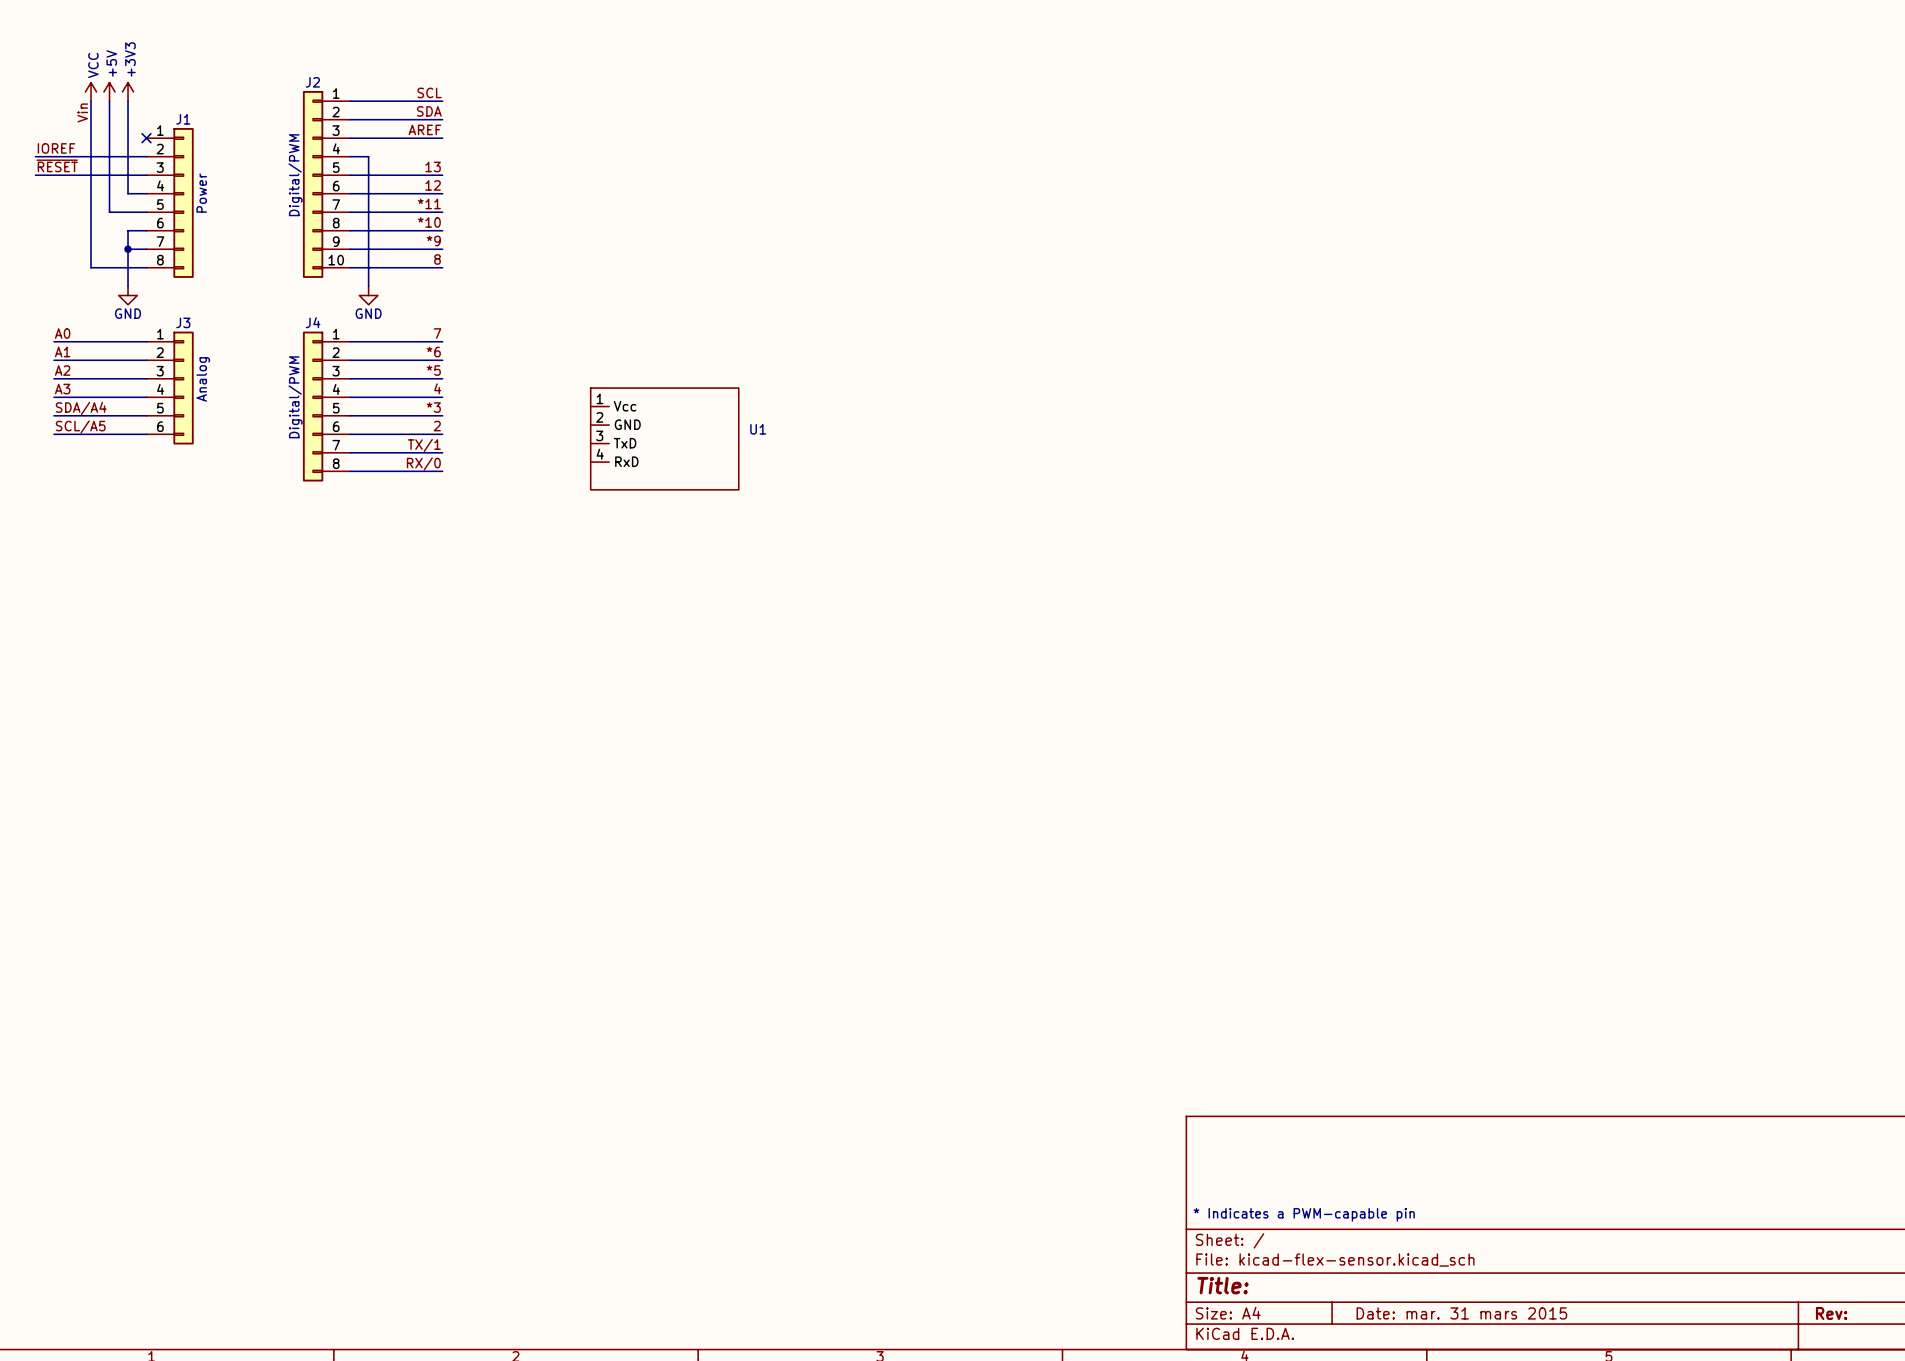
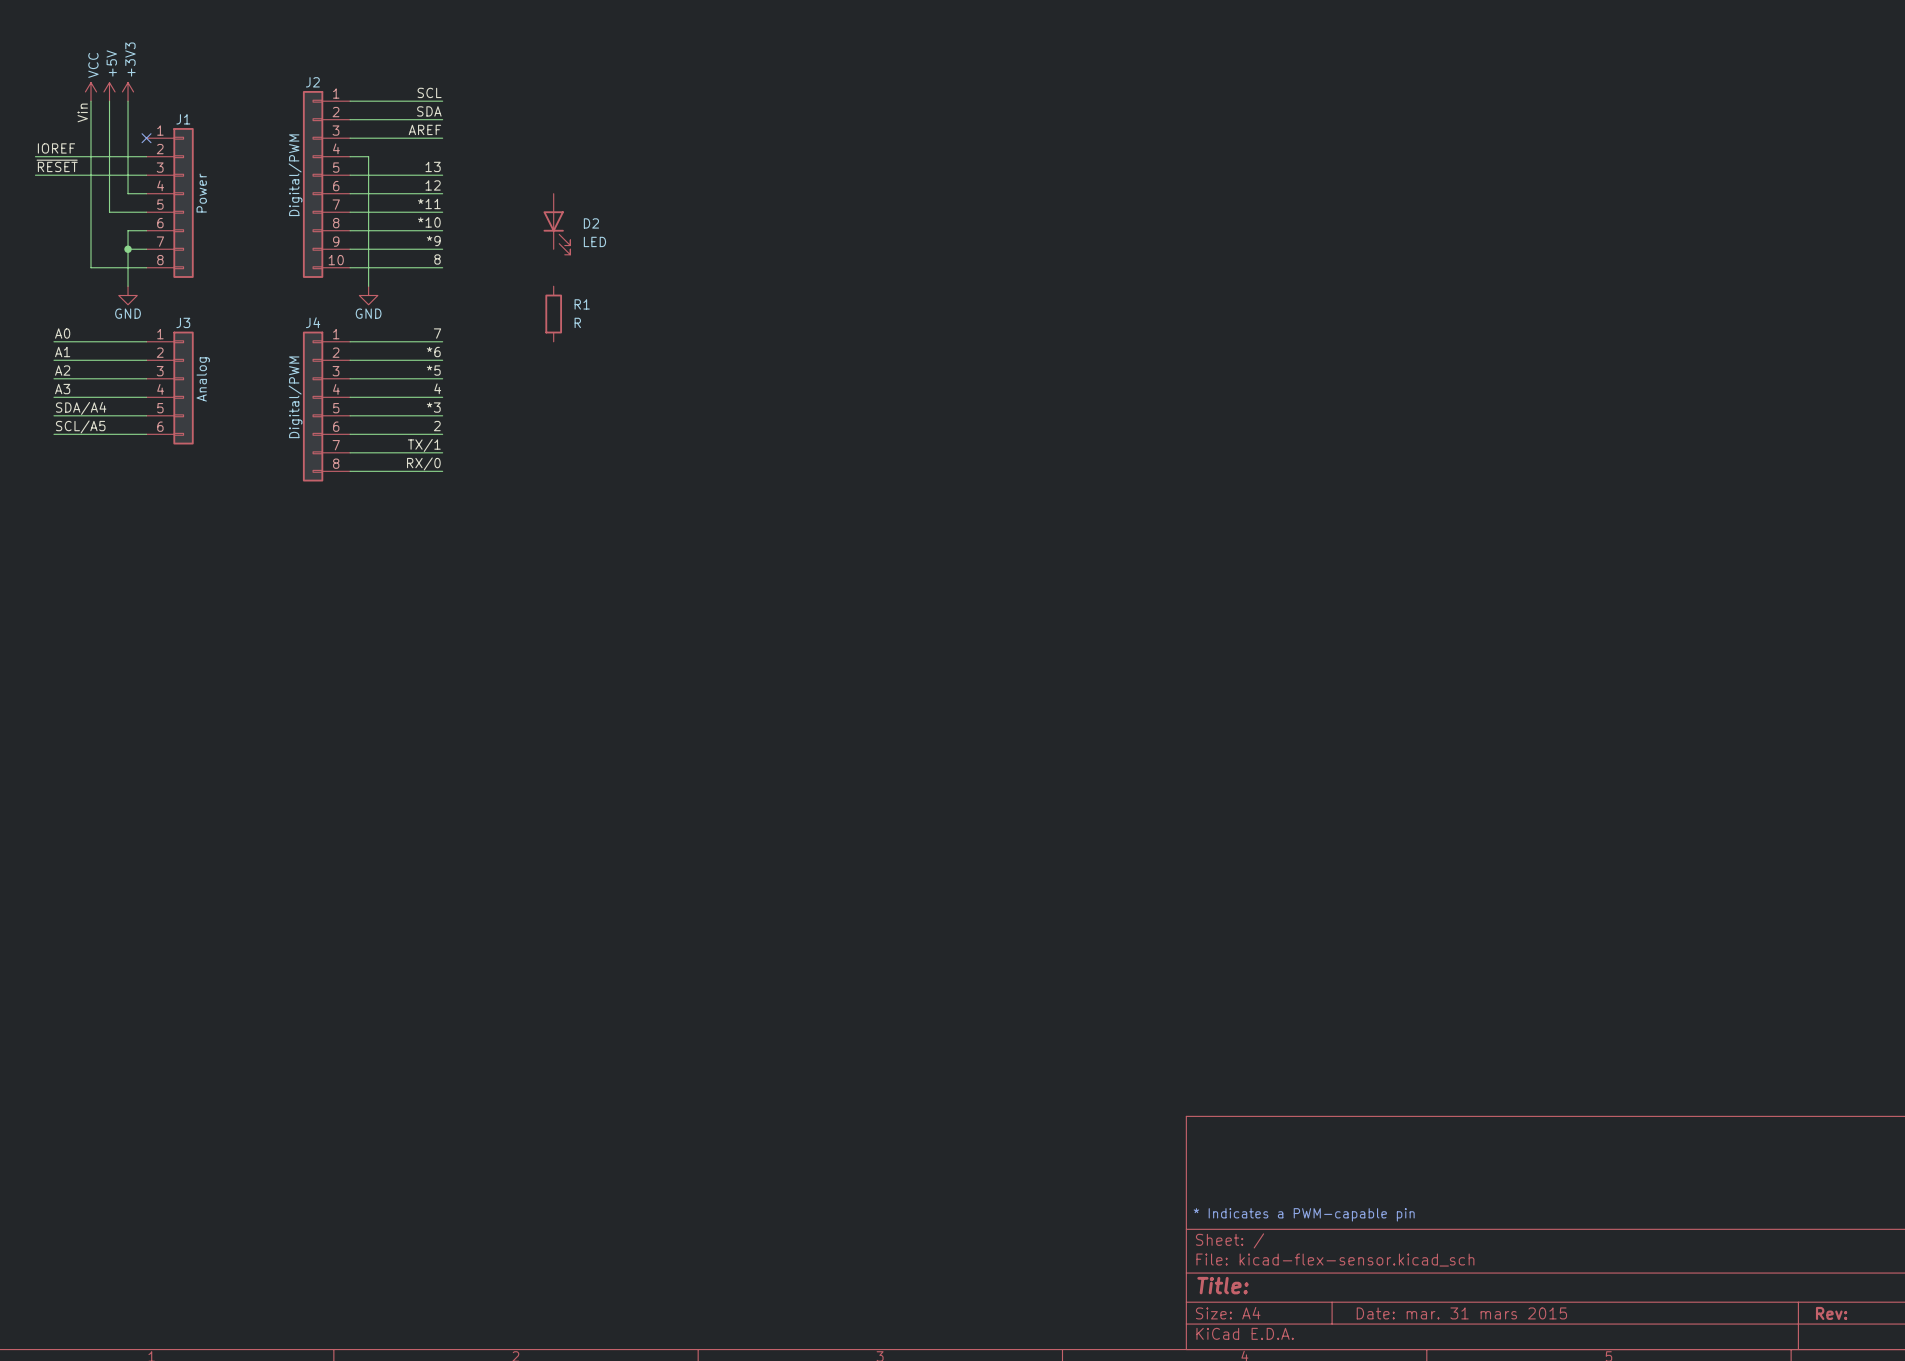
D2: none -> LED (556, 224)
R1: none -> R (553, 314)
U1: (664, 438) -> none

